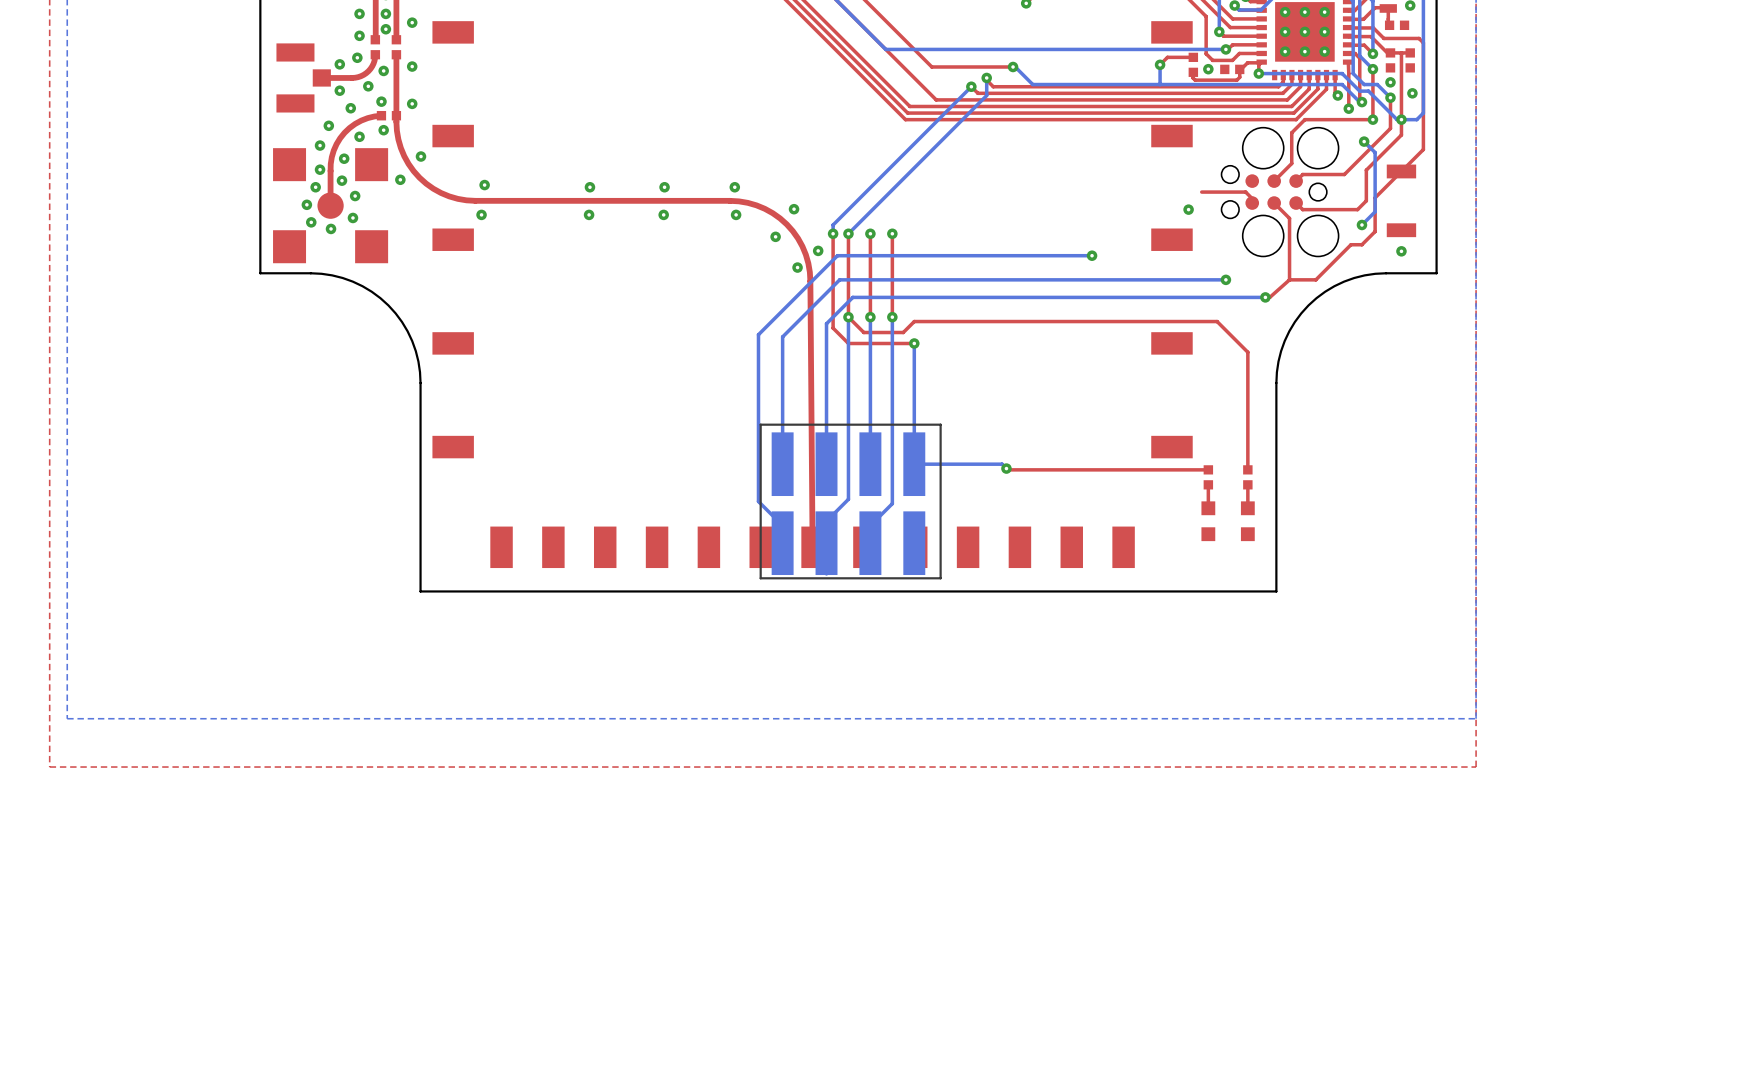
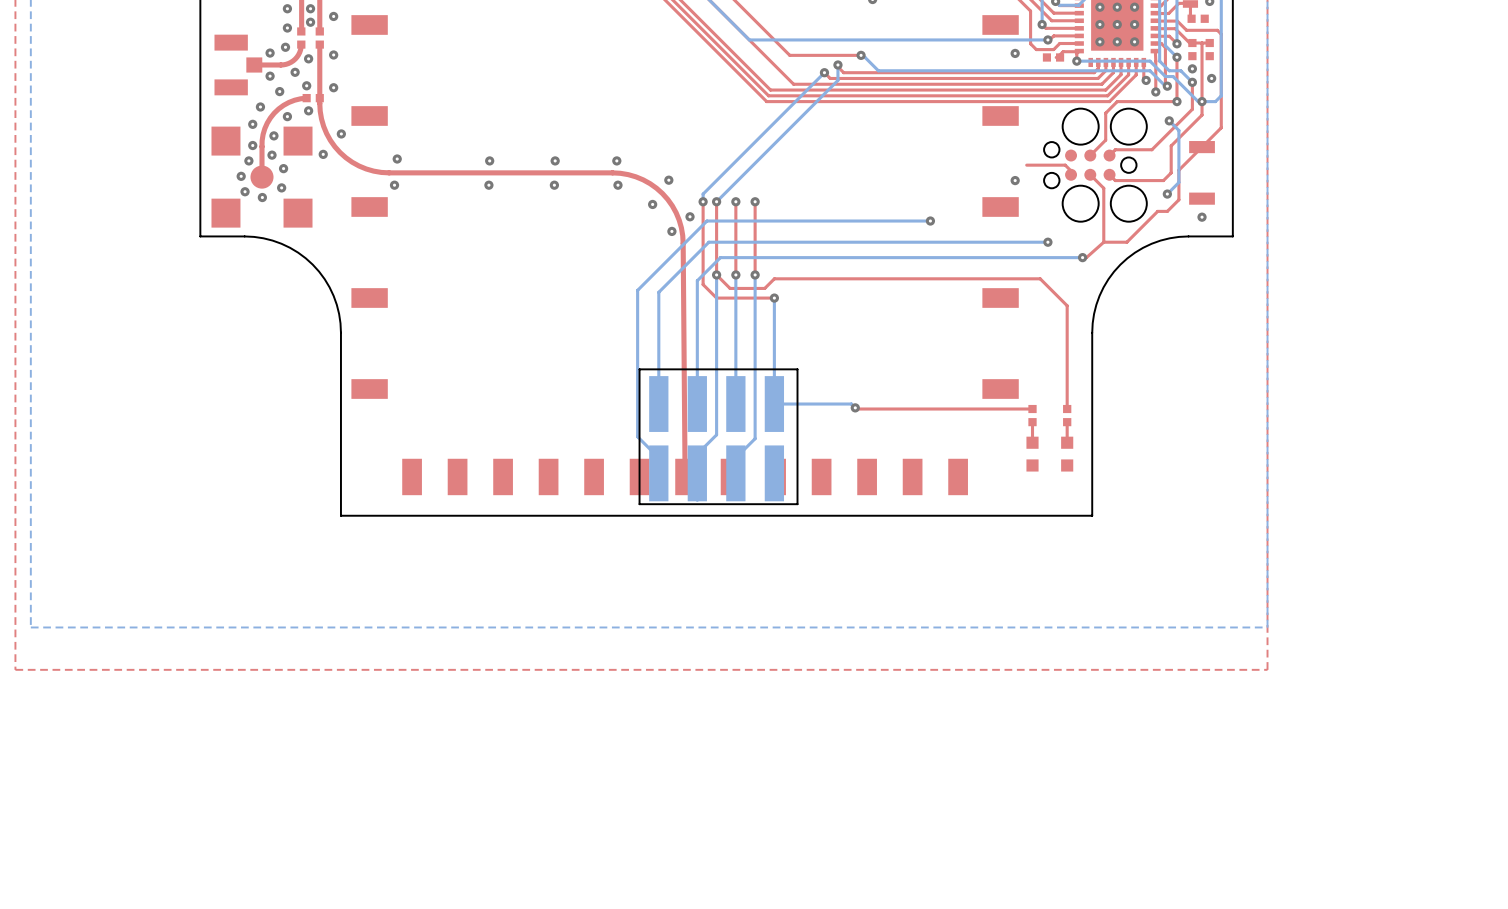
top track: (1193, 57) (1167, 57) (1160, 64) -> none
top track: (1247, 62) (1239, 69) (1239, 77) (1236, 80) (1195, 80) (1192, 77) (1193, 72) -> (1066, 51) (1063, 51) (1056, 57)
bottom track: (1160, 64) (1160, 84) -> none
via: (1160, 64) -> none
via: none -> (1015, 53)
part: (1193, 64) -> none
via: (1208, 69) -> none

